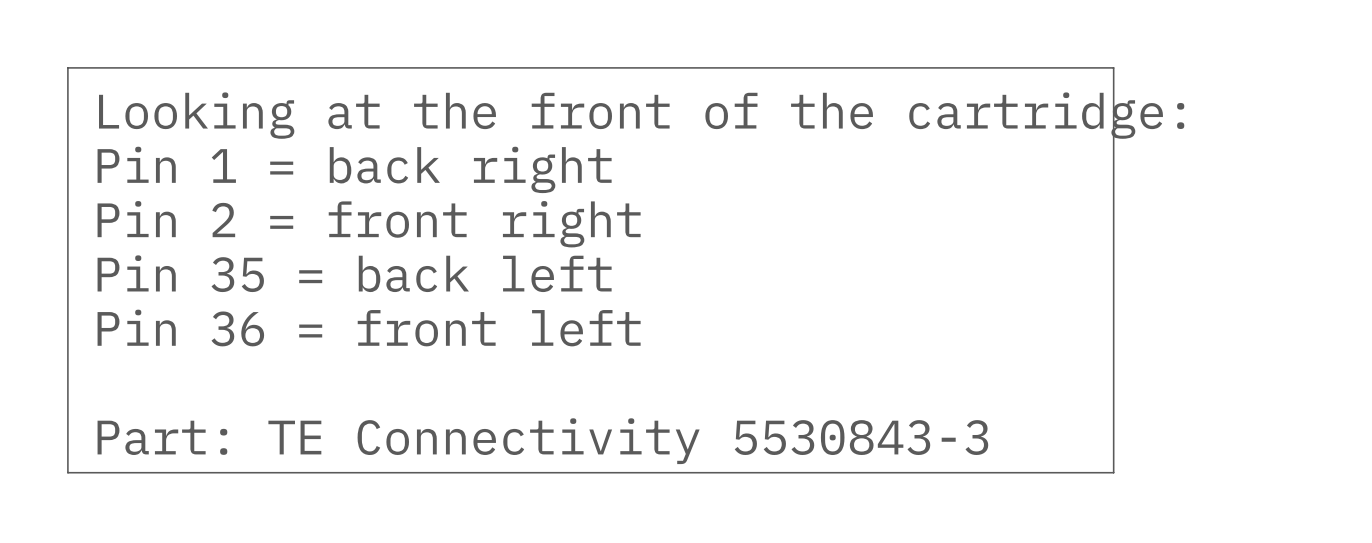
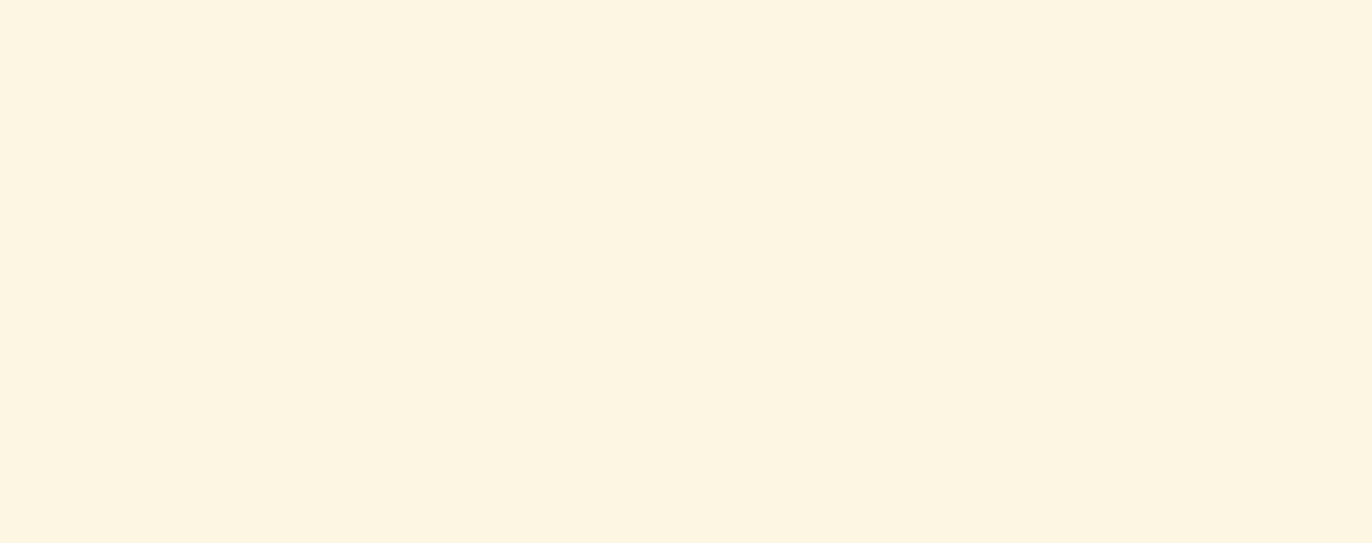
line: (67, 67) (1113, 67) (1113, 472) (67, 472) (67, 67) -> none
text: Looking at the front of the cartridge: (641, 115) -> none
text: Pin 1 = back right (354, 169) -> none
text: Pin 2 = front right (369, 224) -> none
text: Pin 35 = back left (354, 273) -> none
text: Pin 36 = front left (369, 328) -> none
text: Part: TE Connectivity 5530843-3 (542, 441) -> none

